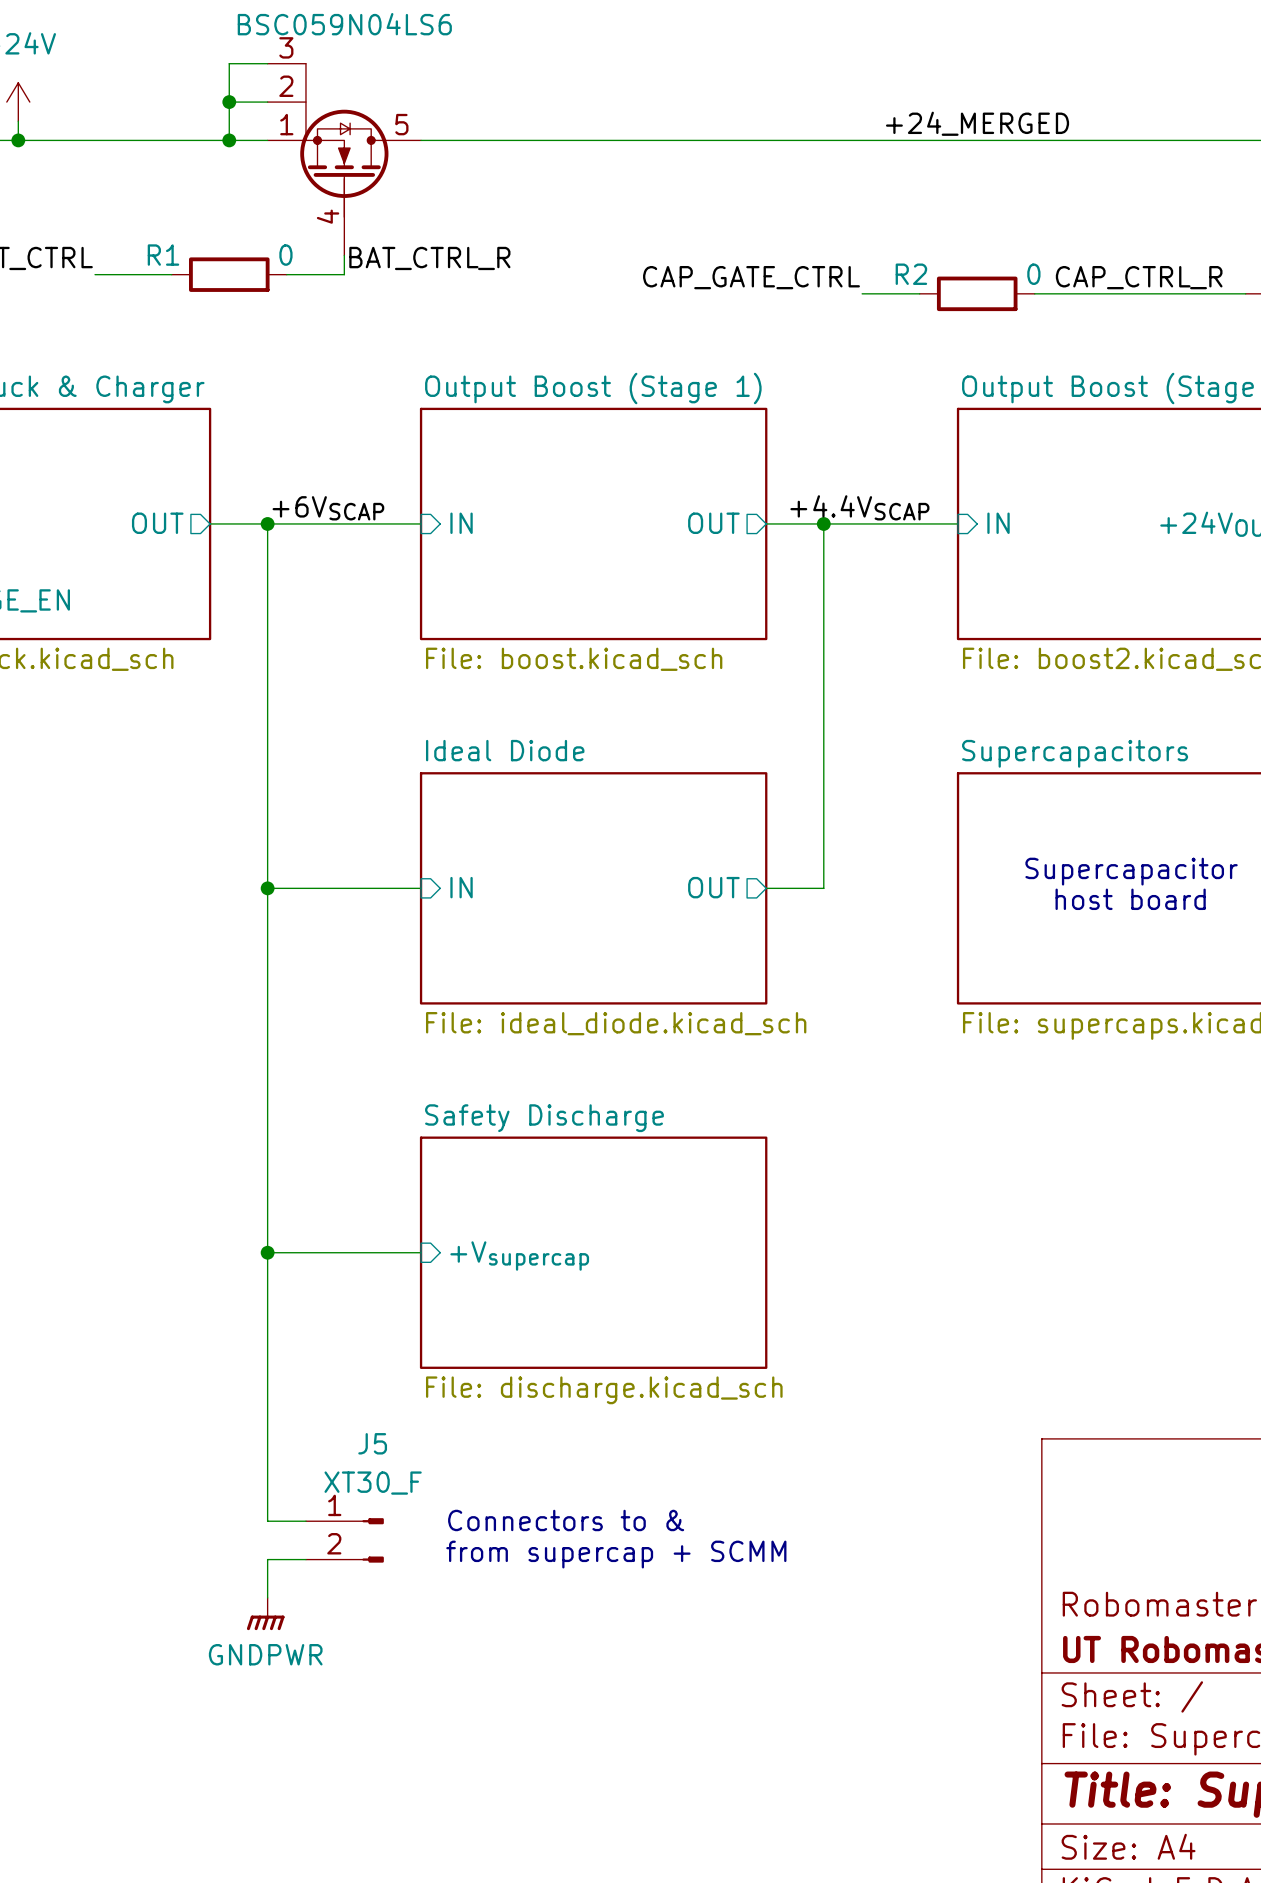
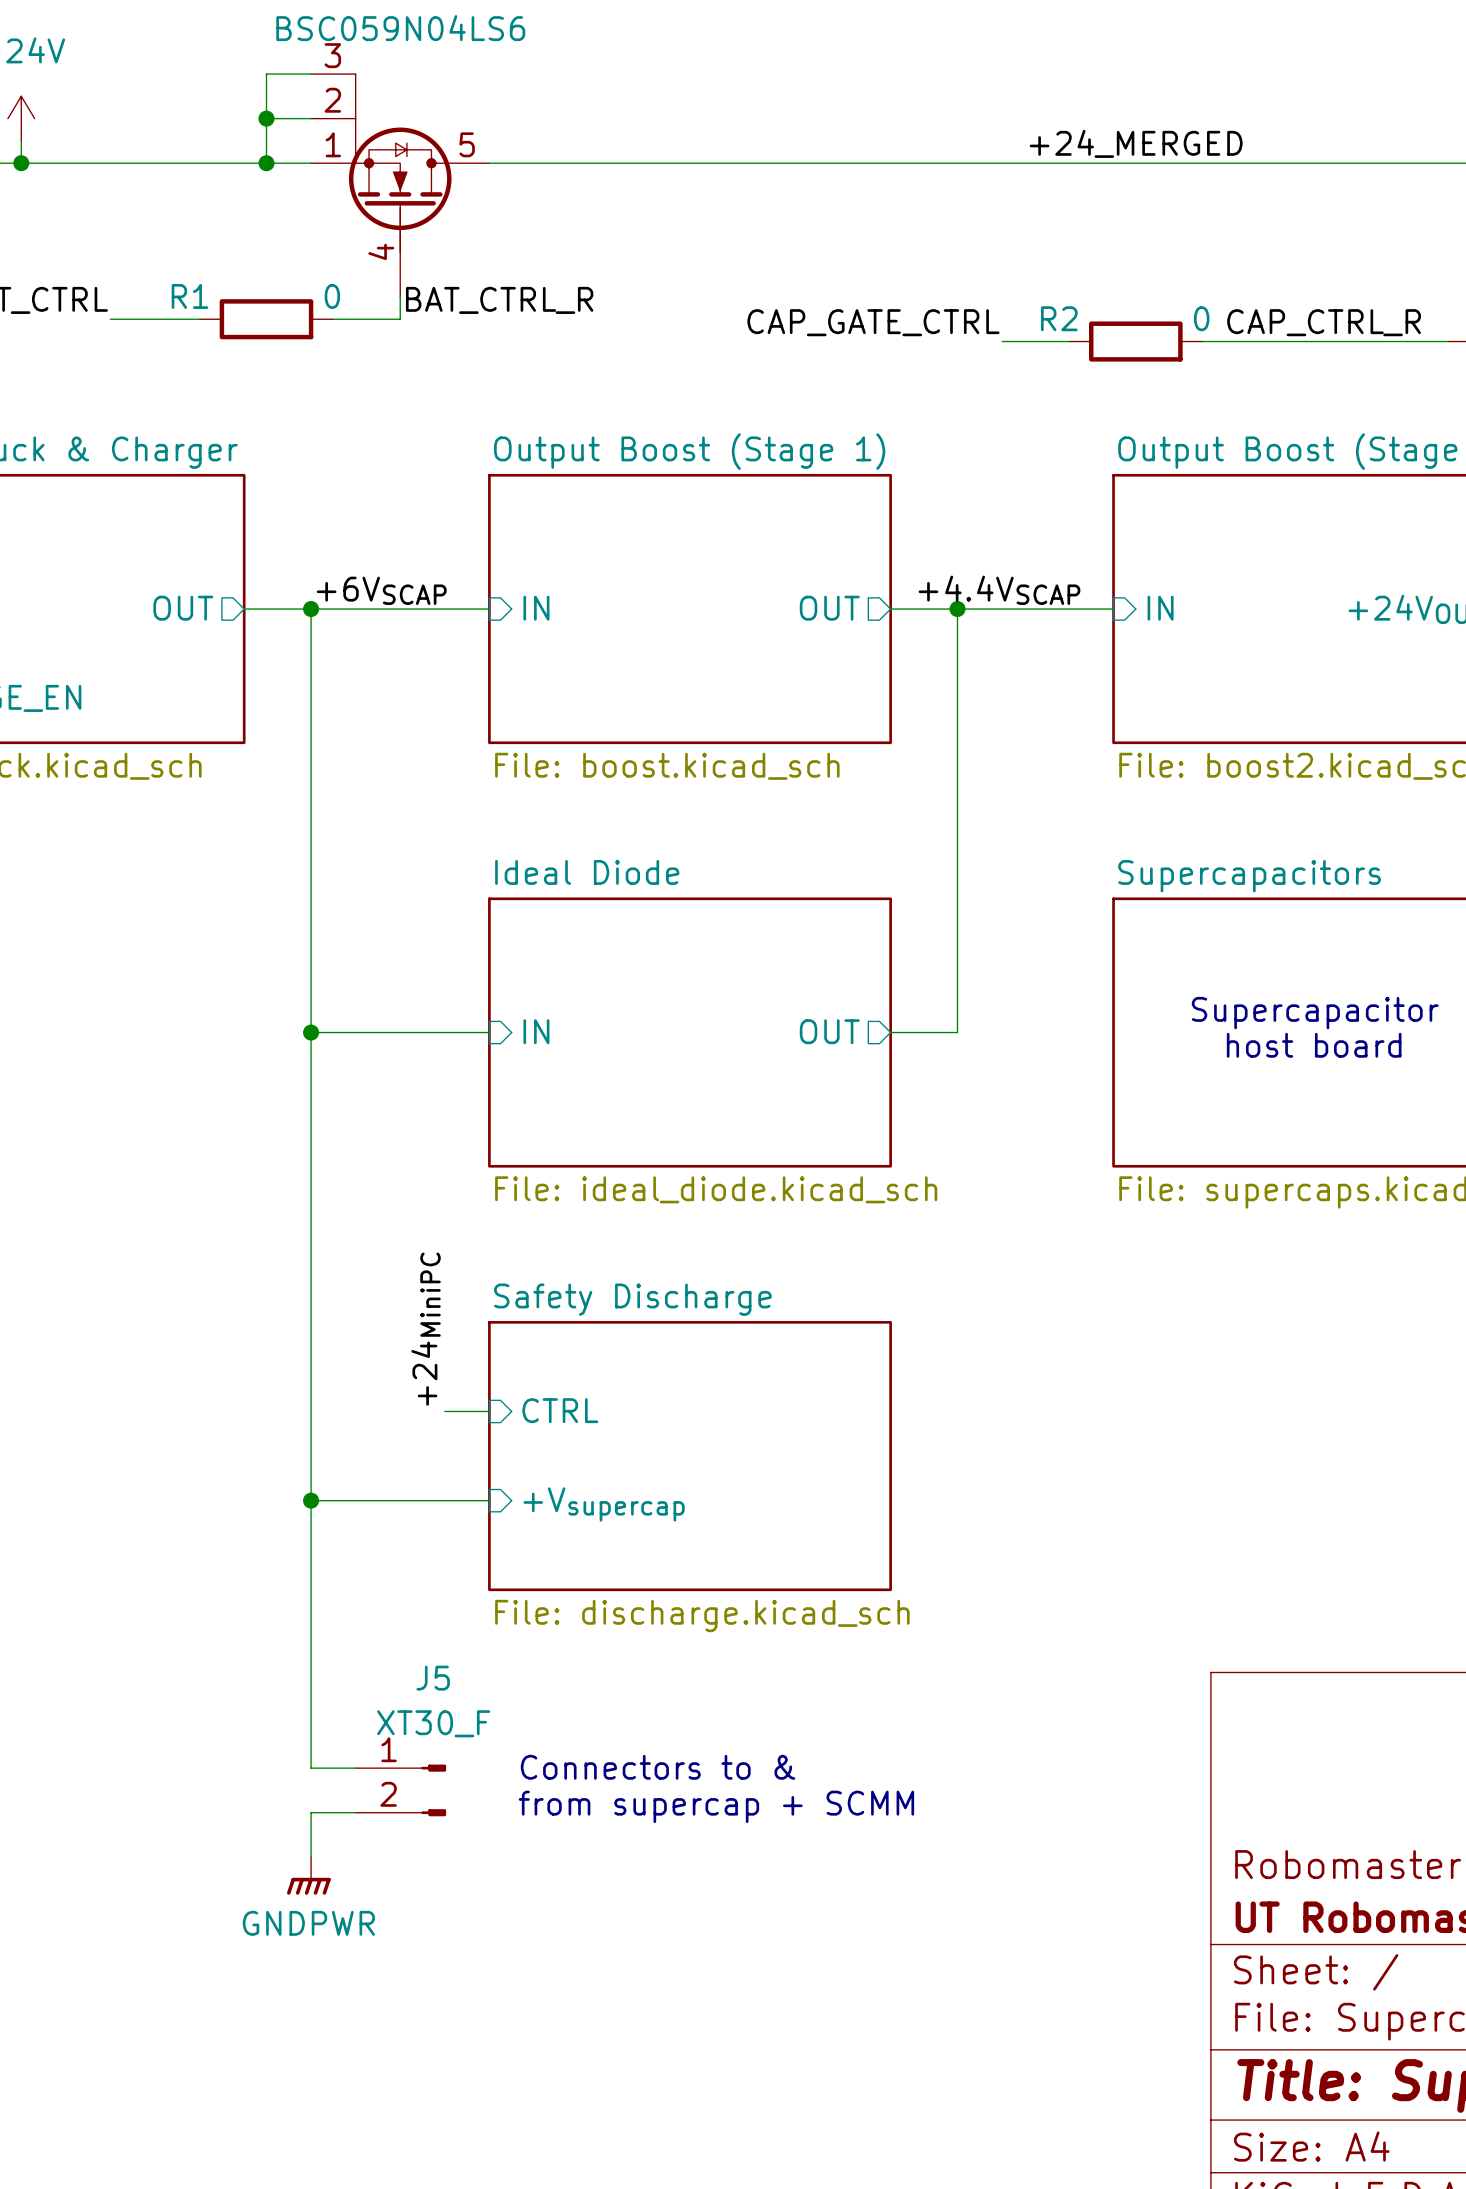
label: none -> +24MiniPC (426, 1329)
sheet pin: none -> CTRL (560, 1410)
wire: none -> (444, 1411) (489, 1411)
wire: (267, 1252) (421, 1252) -> (311, 1500) (489, 1500)
junction position: (267, 1252) -> (311, 1500)
sheet pin position: +Vsupercap (519, 1256) -> +Vsupercap (604, 1504)

